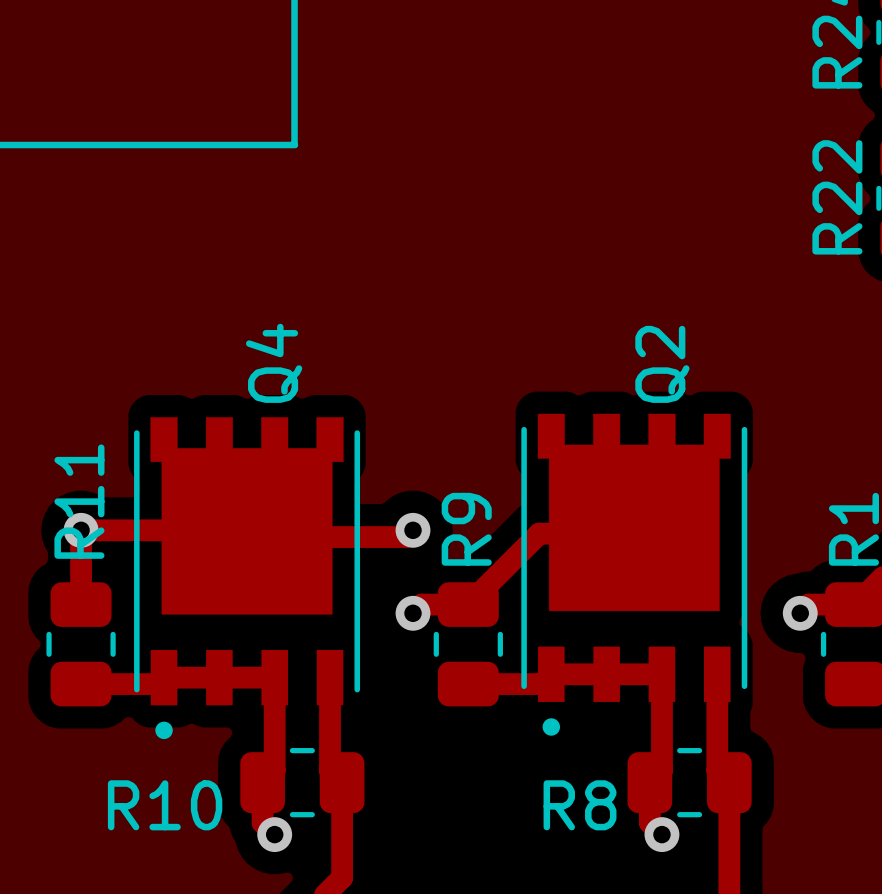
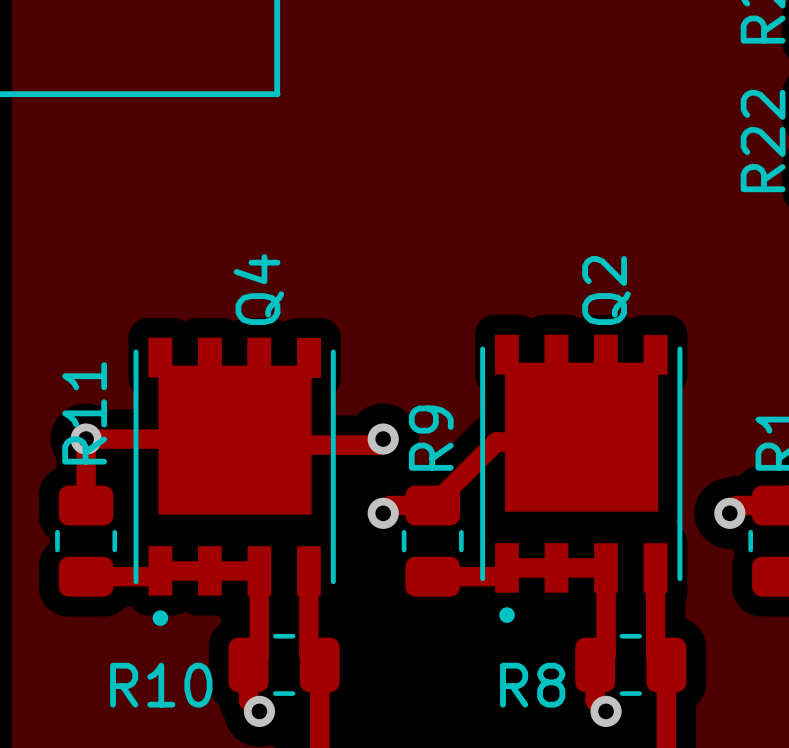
Q2 footprint: [521, 413, 748, 736] -> [480, 334, 683, 623]
Q4 footprint: [134, 417, 361, 740] -> [133, 337, 336, 626]

